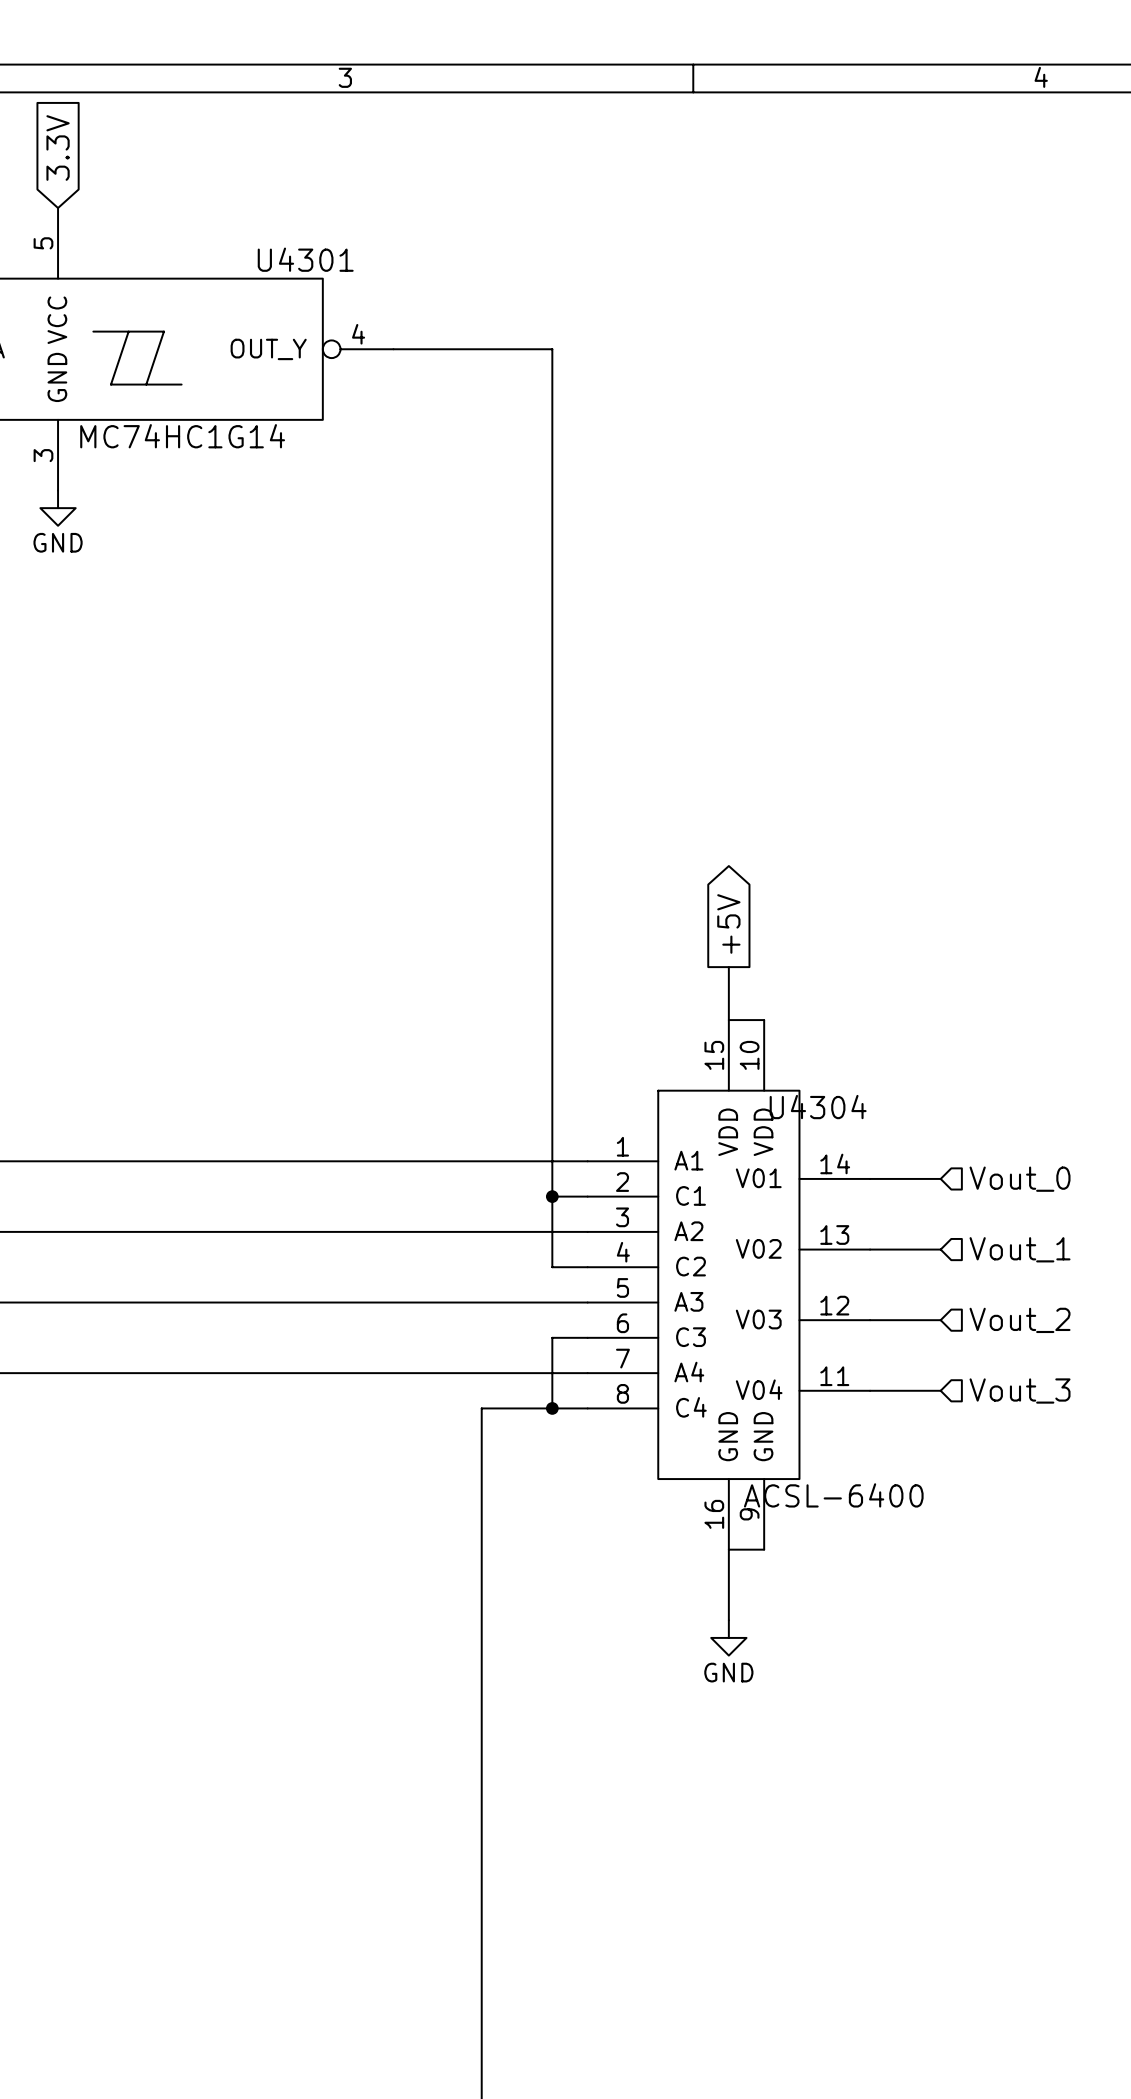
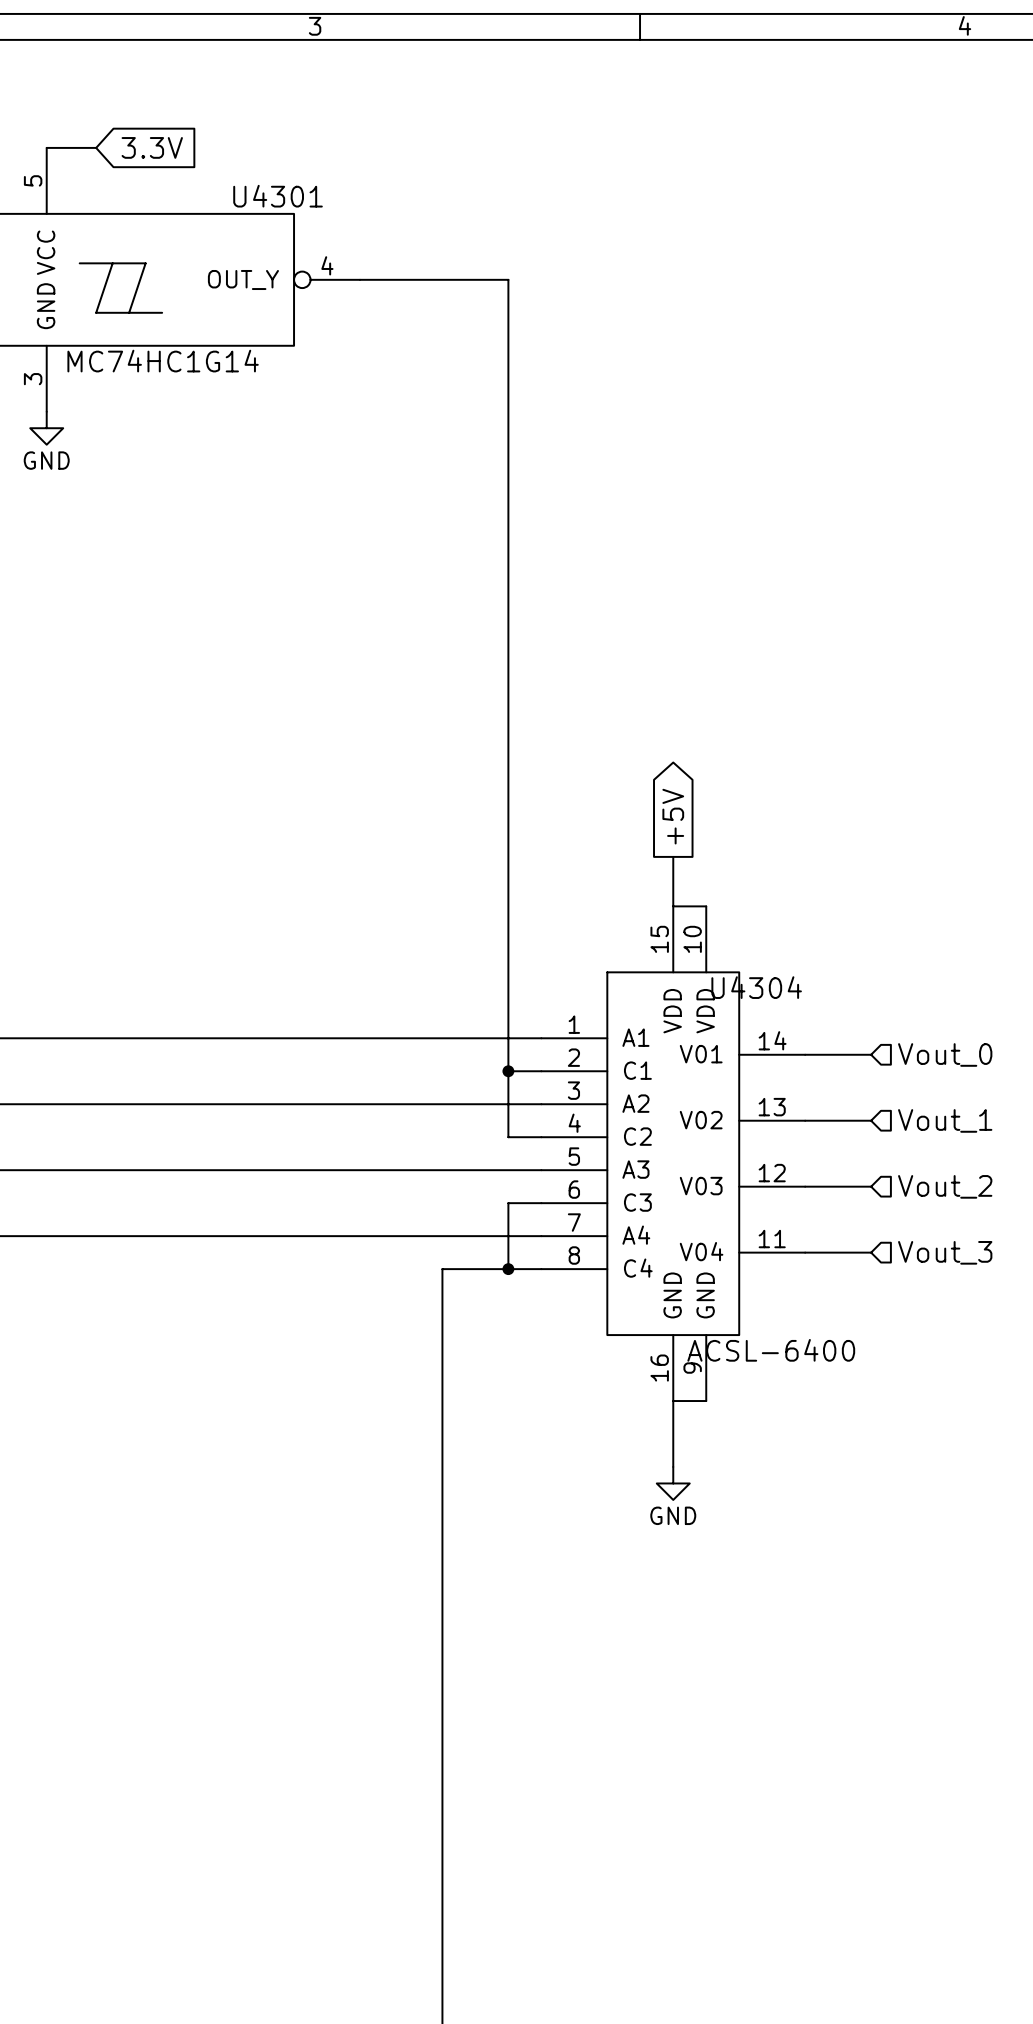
global label rotation: 0° (58, 148) -> 90° clockwise (152, 147)
global label position: 3.3V (58, 148) -> 3.3V (152, 147)
wire: none -> (46, 147) (96, 147)

